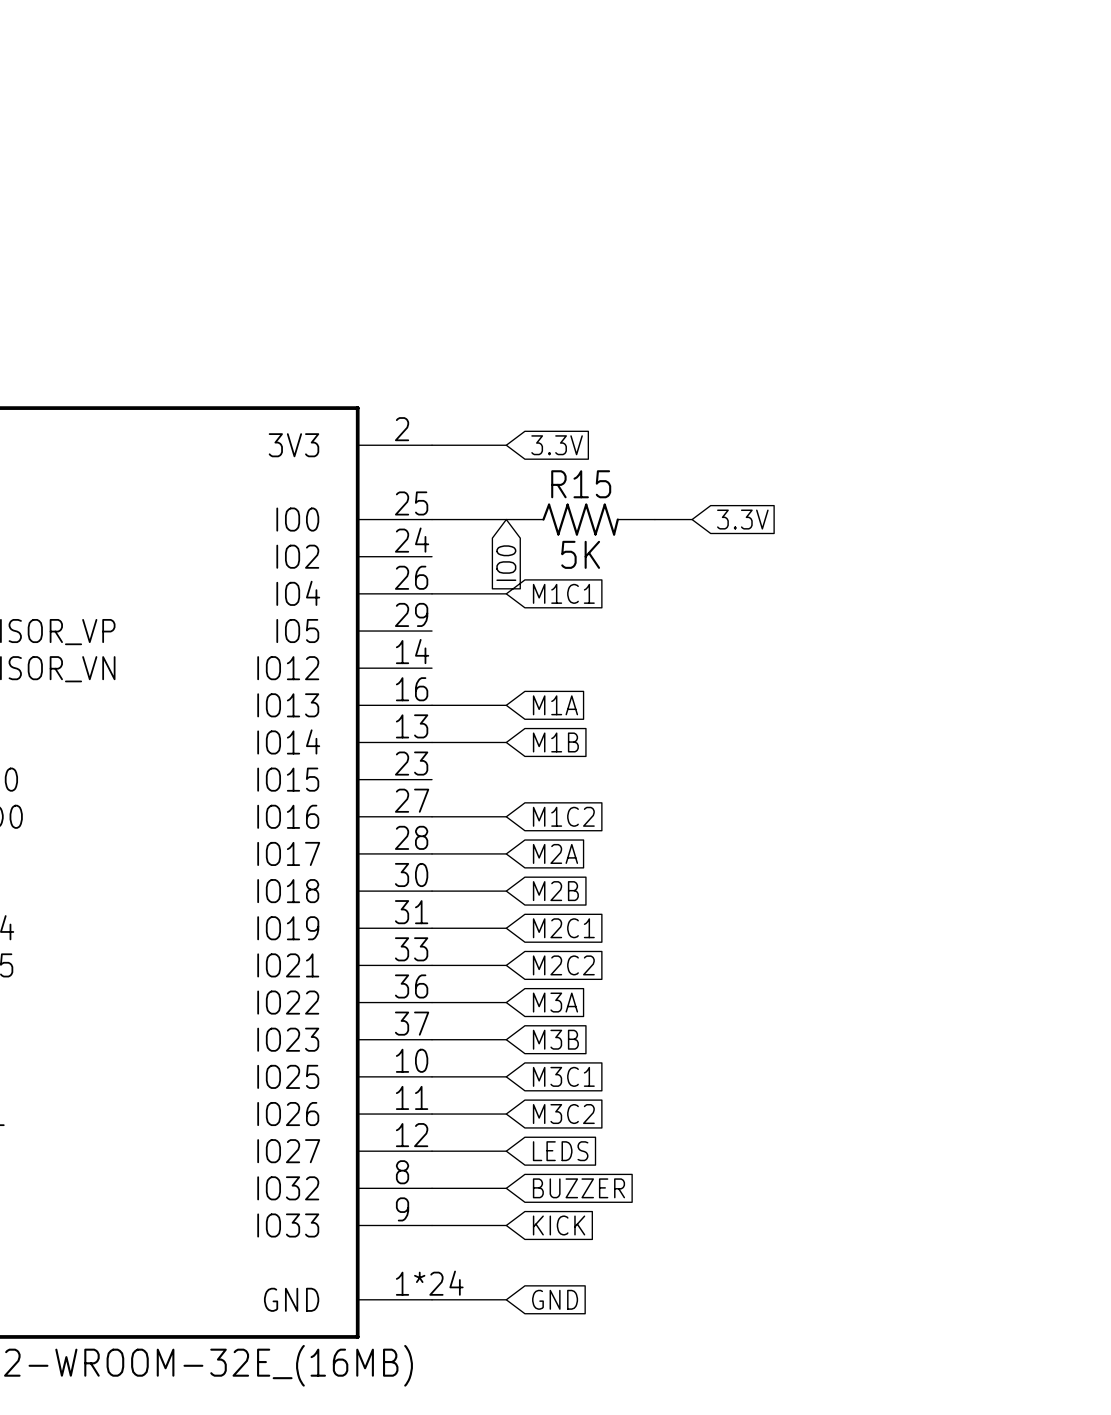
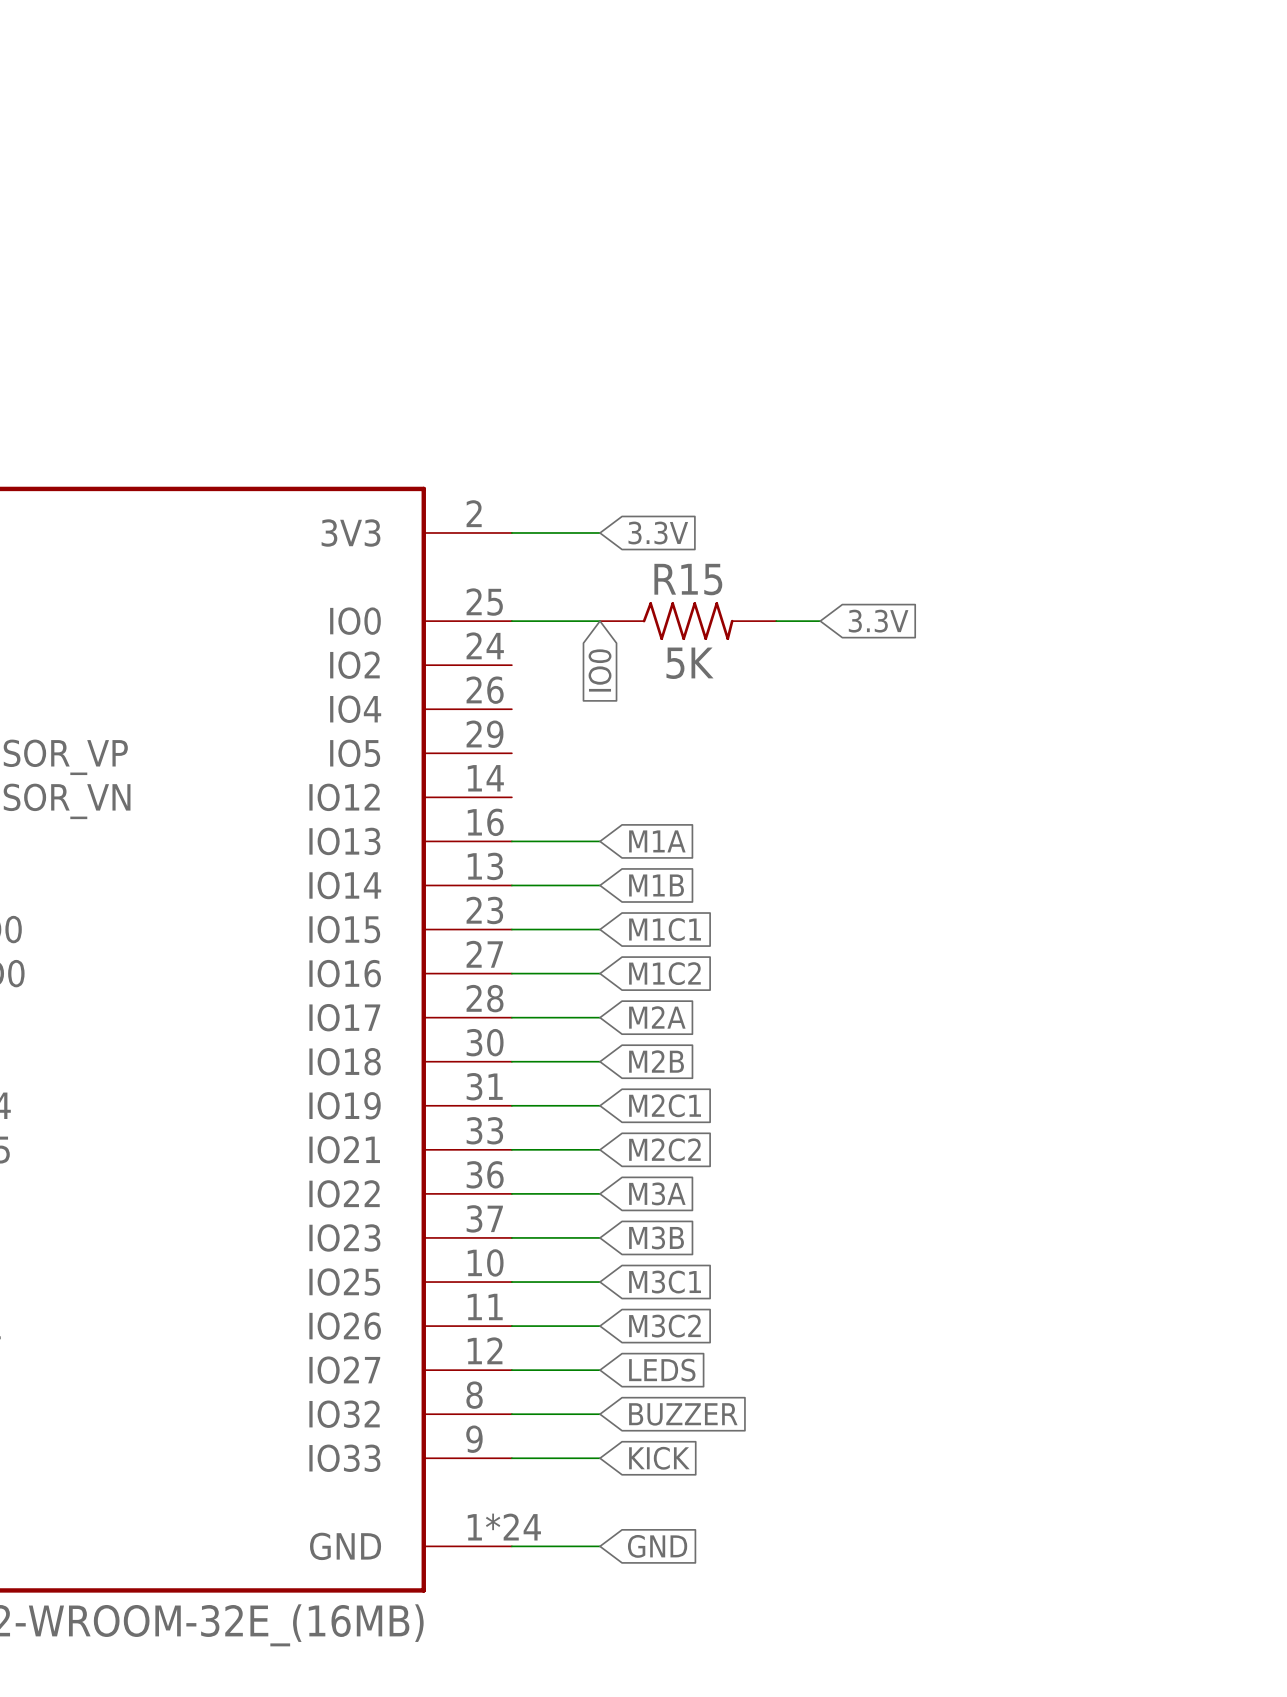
wire: (432, 593) (506, 593) -> (511, 929) (600, 929)
global label position: M1C1 (563, 593) -> M1C1 (665, 929)

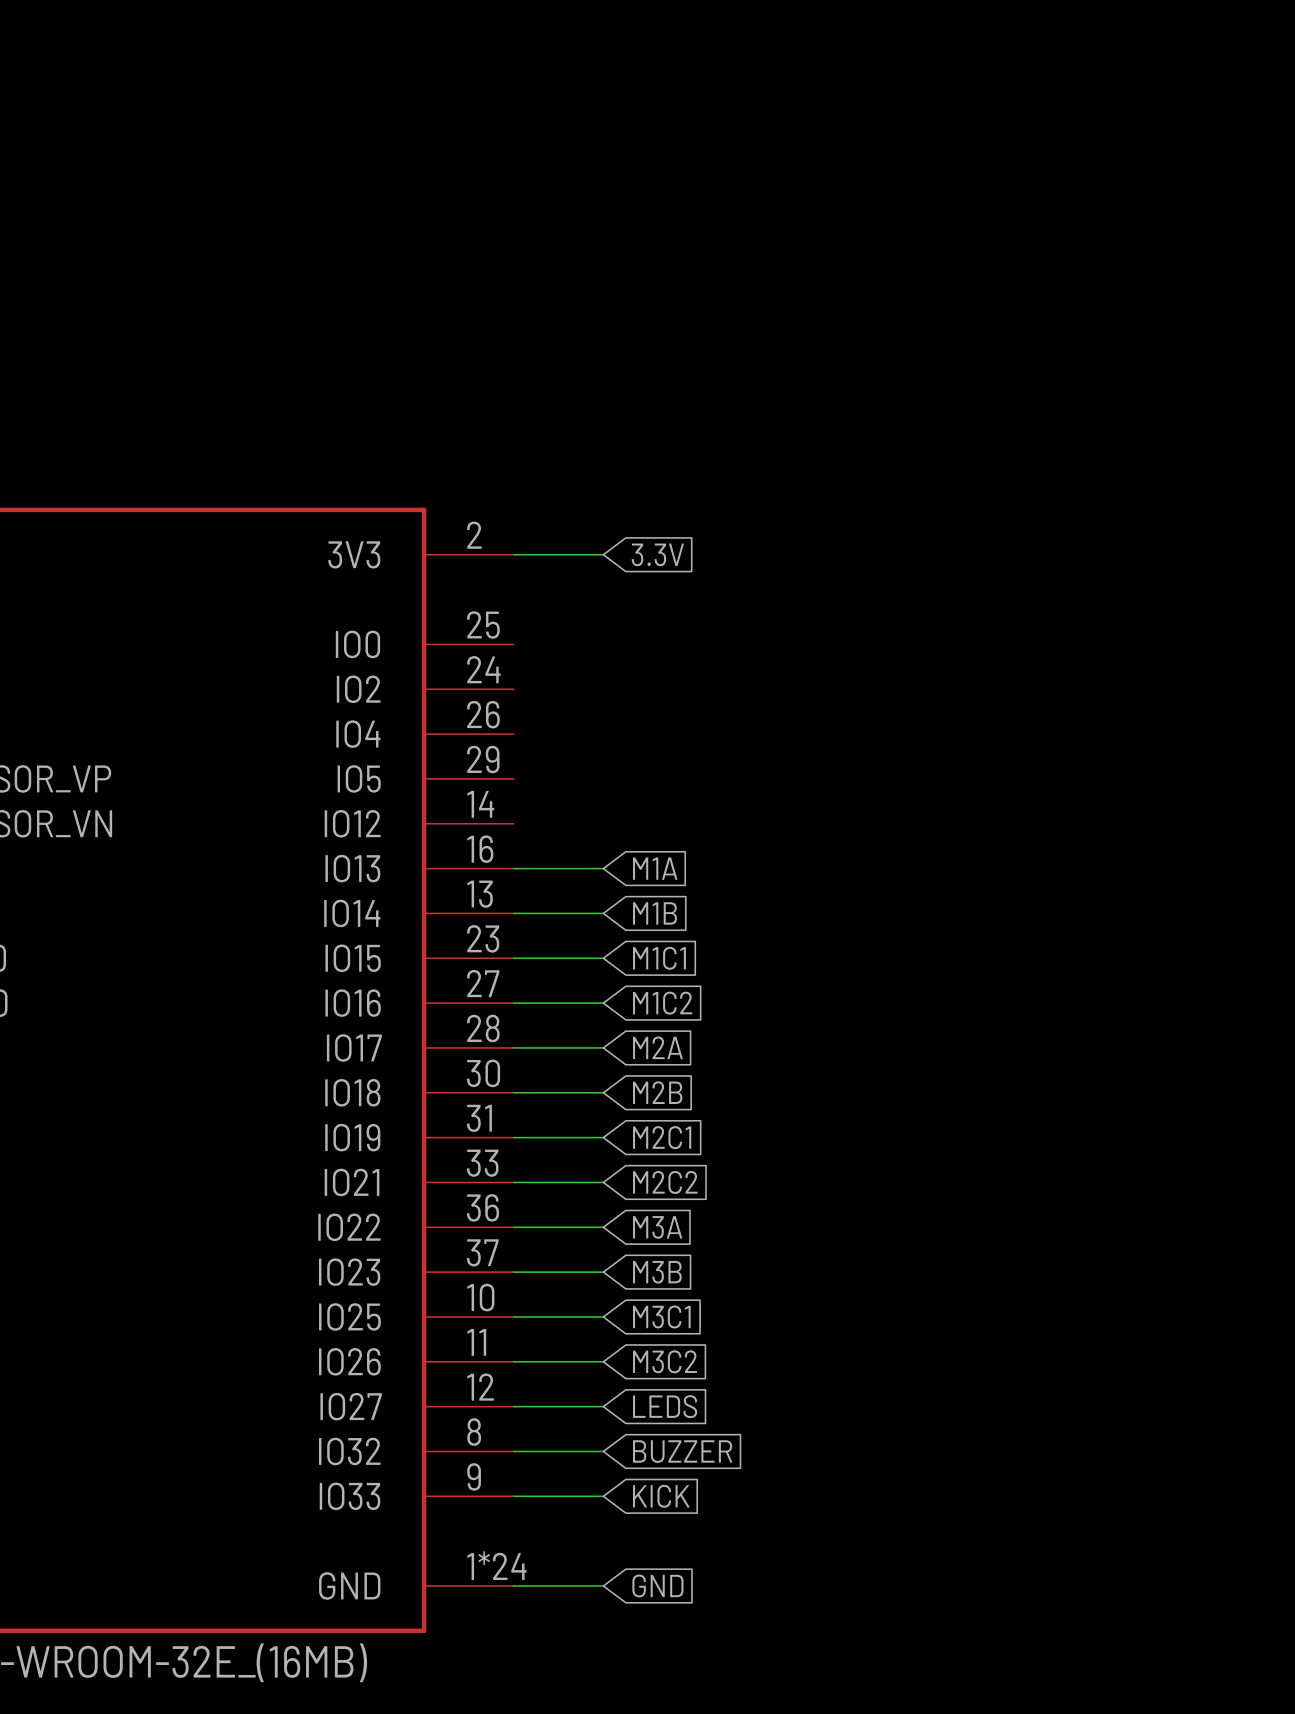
wire: (511, 621) (600, 621) -> none
R15: 5K (688, 621) -> none
wire: (776, 621) (820, 621) -> none
global label: 3.3V (878, 621) -> none
global label: IO0 (600, 670) -> none

